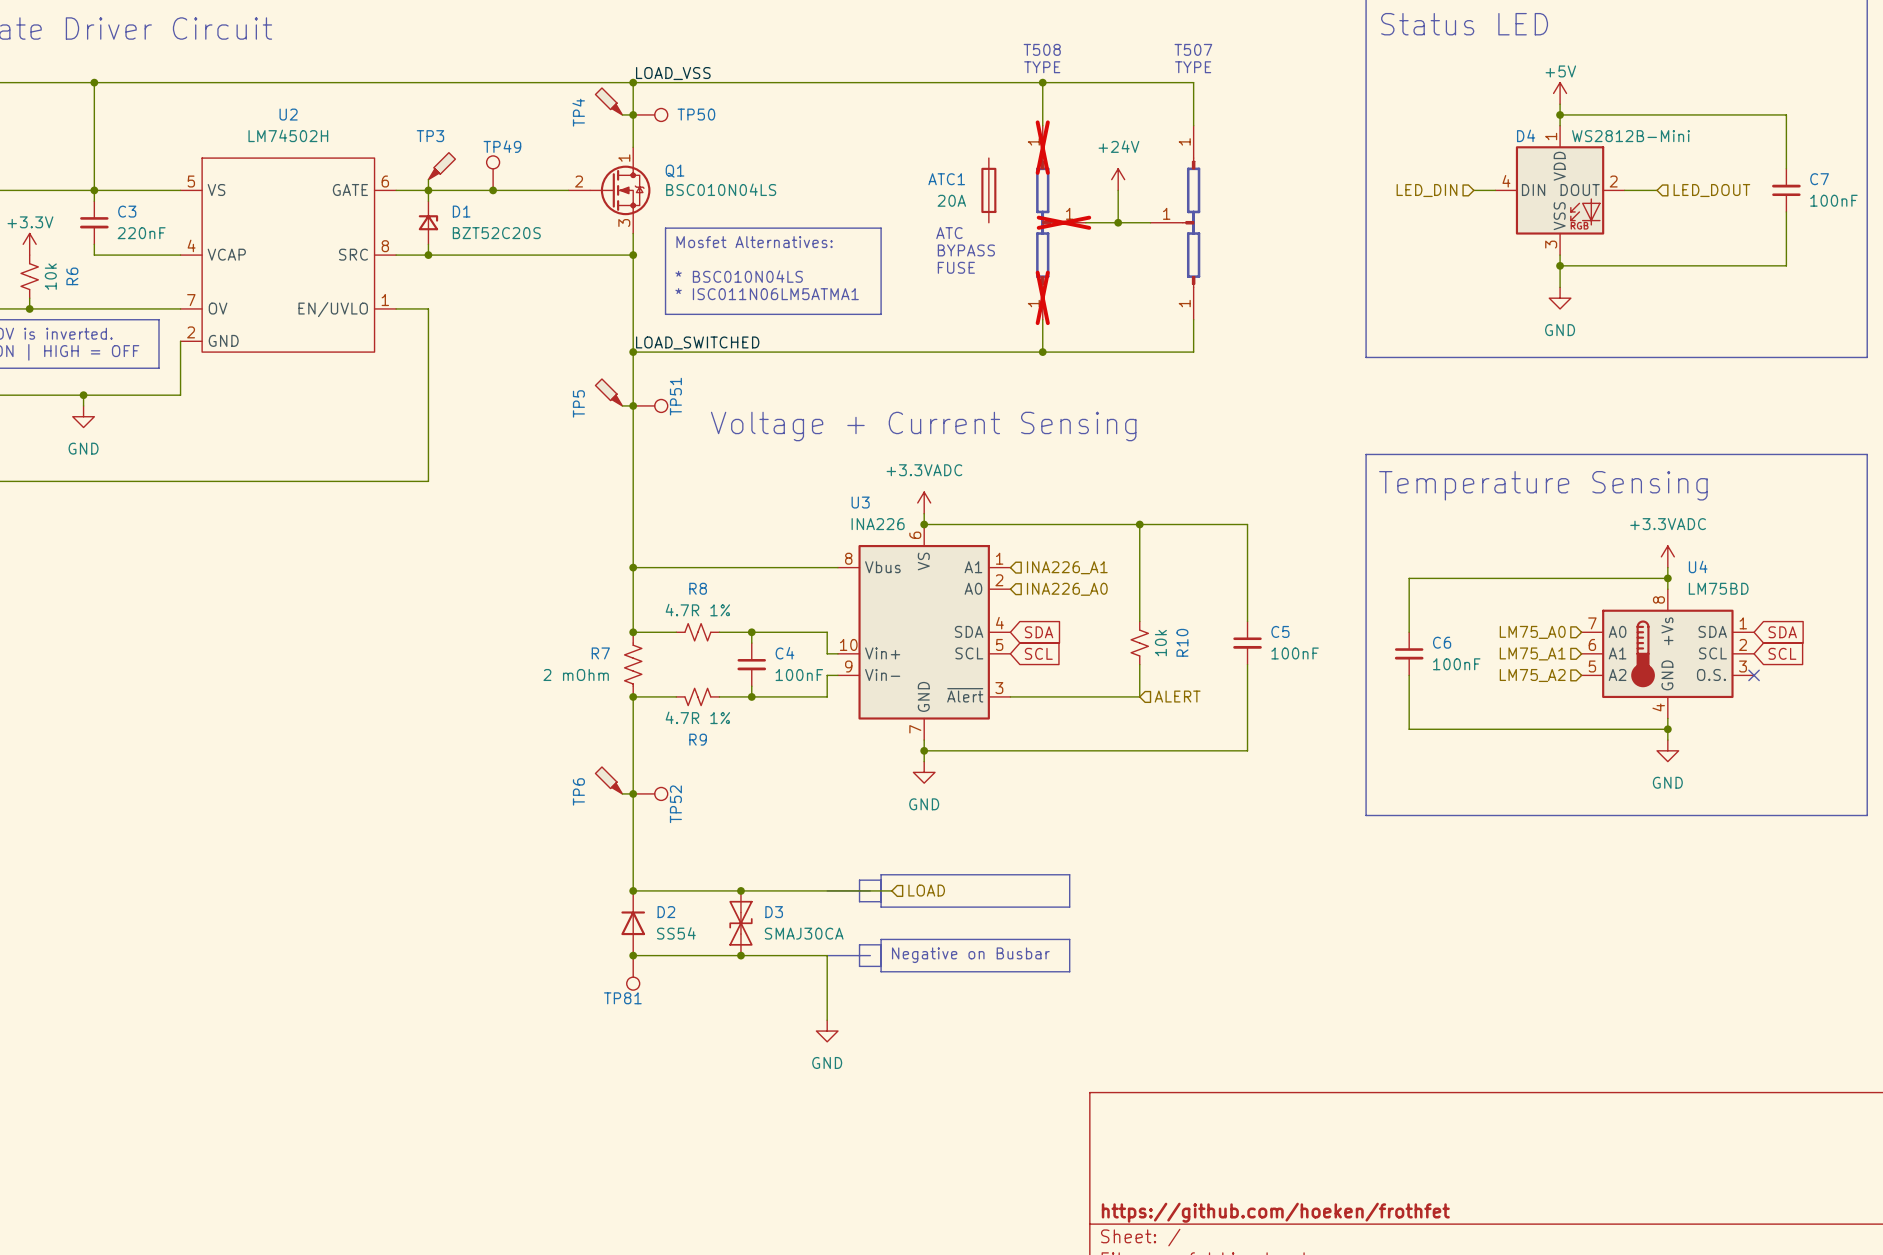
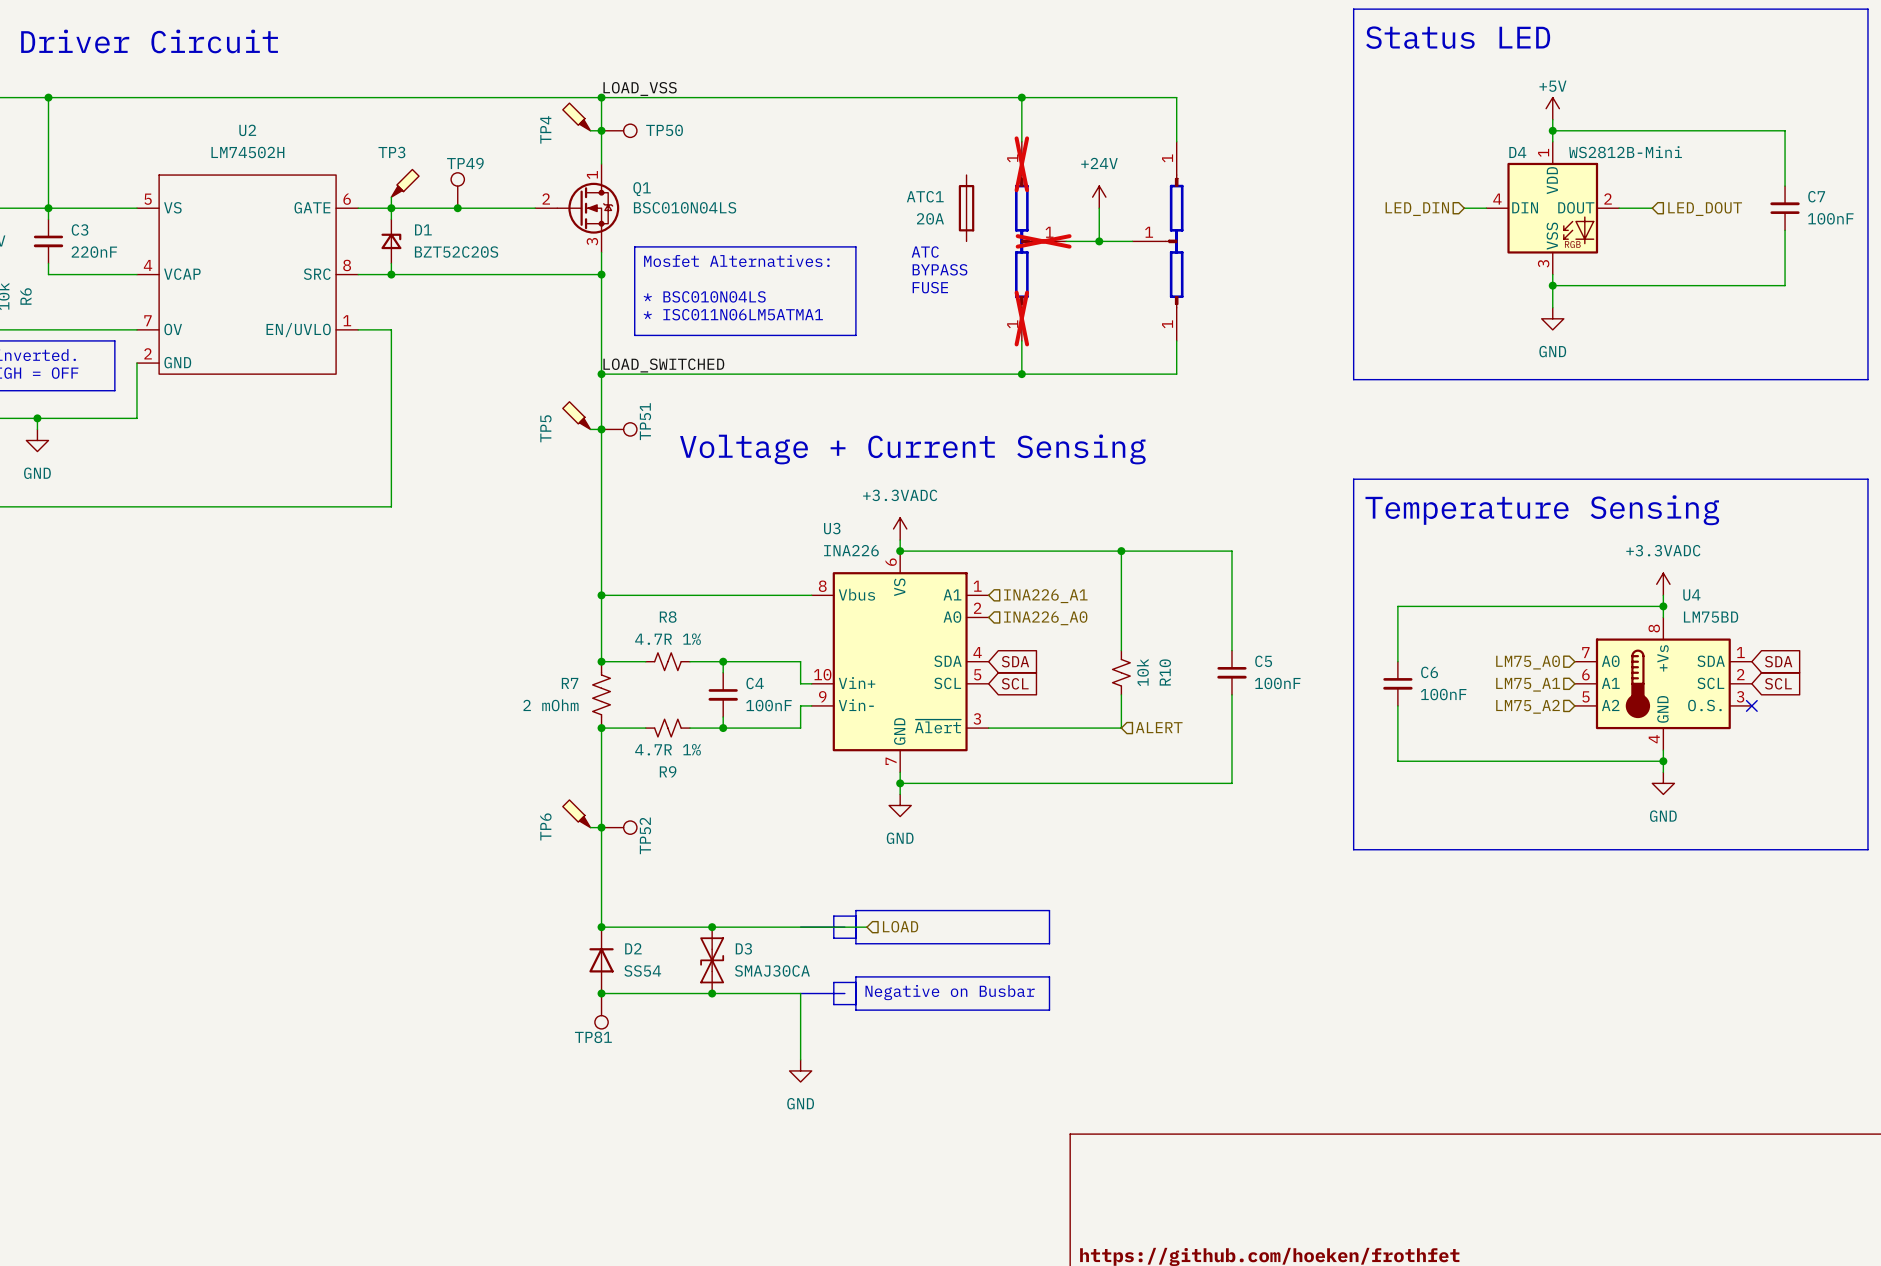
text: T508 (1042, 49) -> none
text: T507 (1193, 49) -> none
text: TYPE (1042, 67) -> none
text: TYPE (1193, 67) -> none

